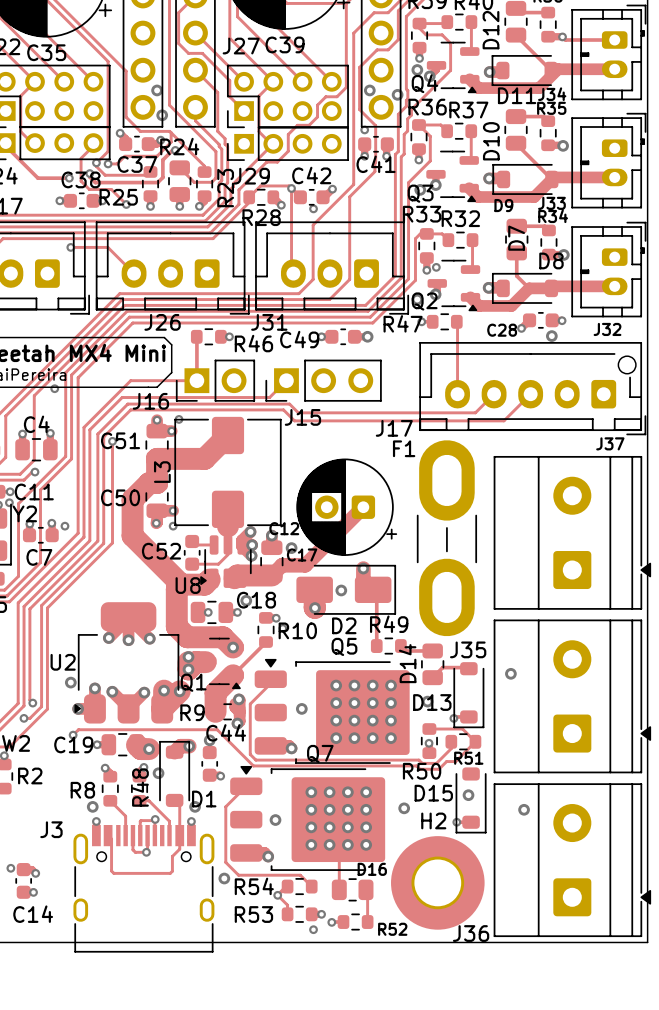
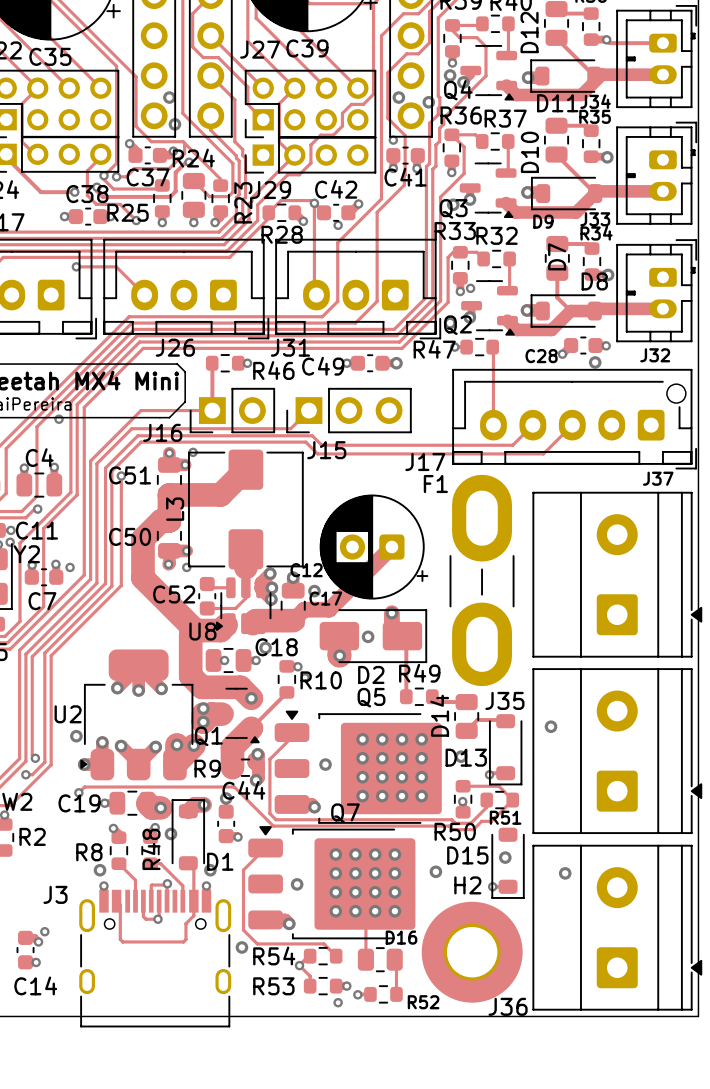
via: none -> (44, 931)
via: (10, 868) -> none

